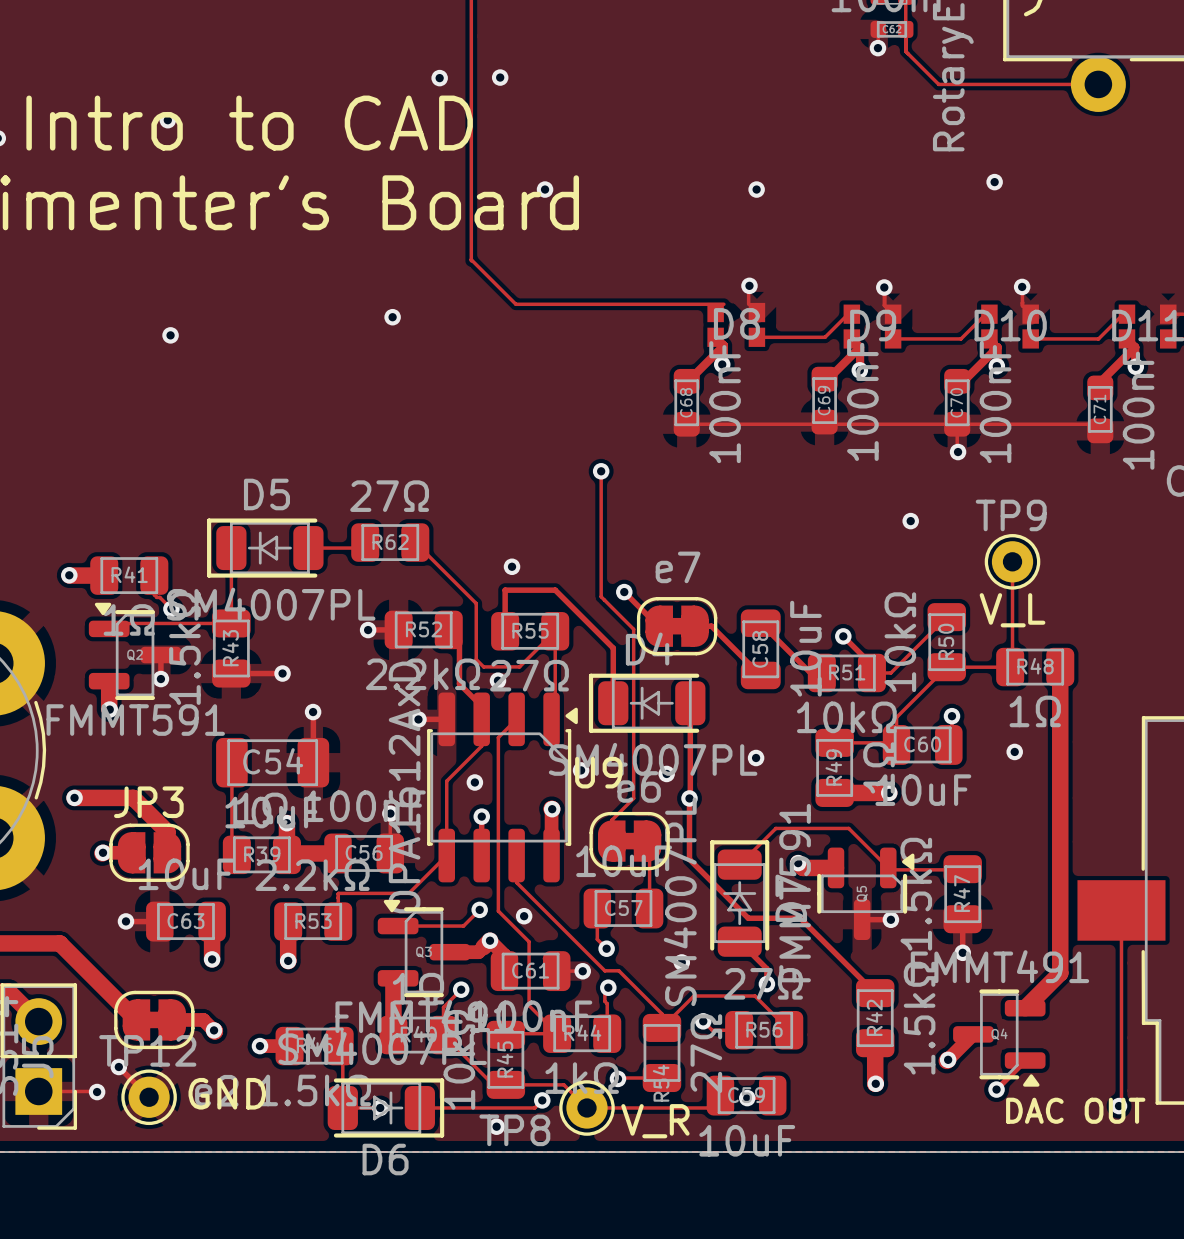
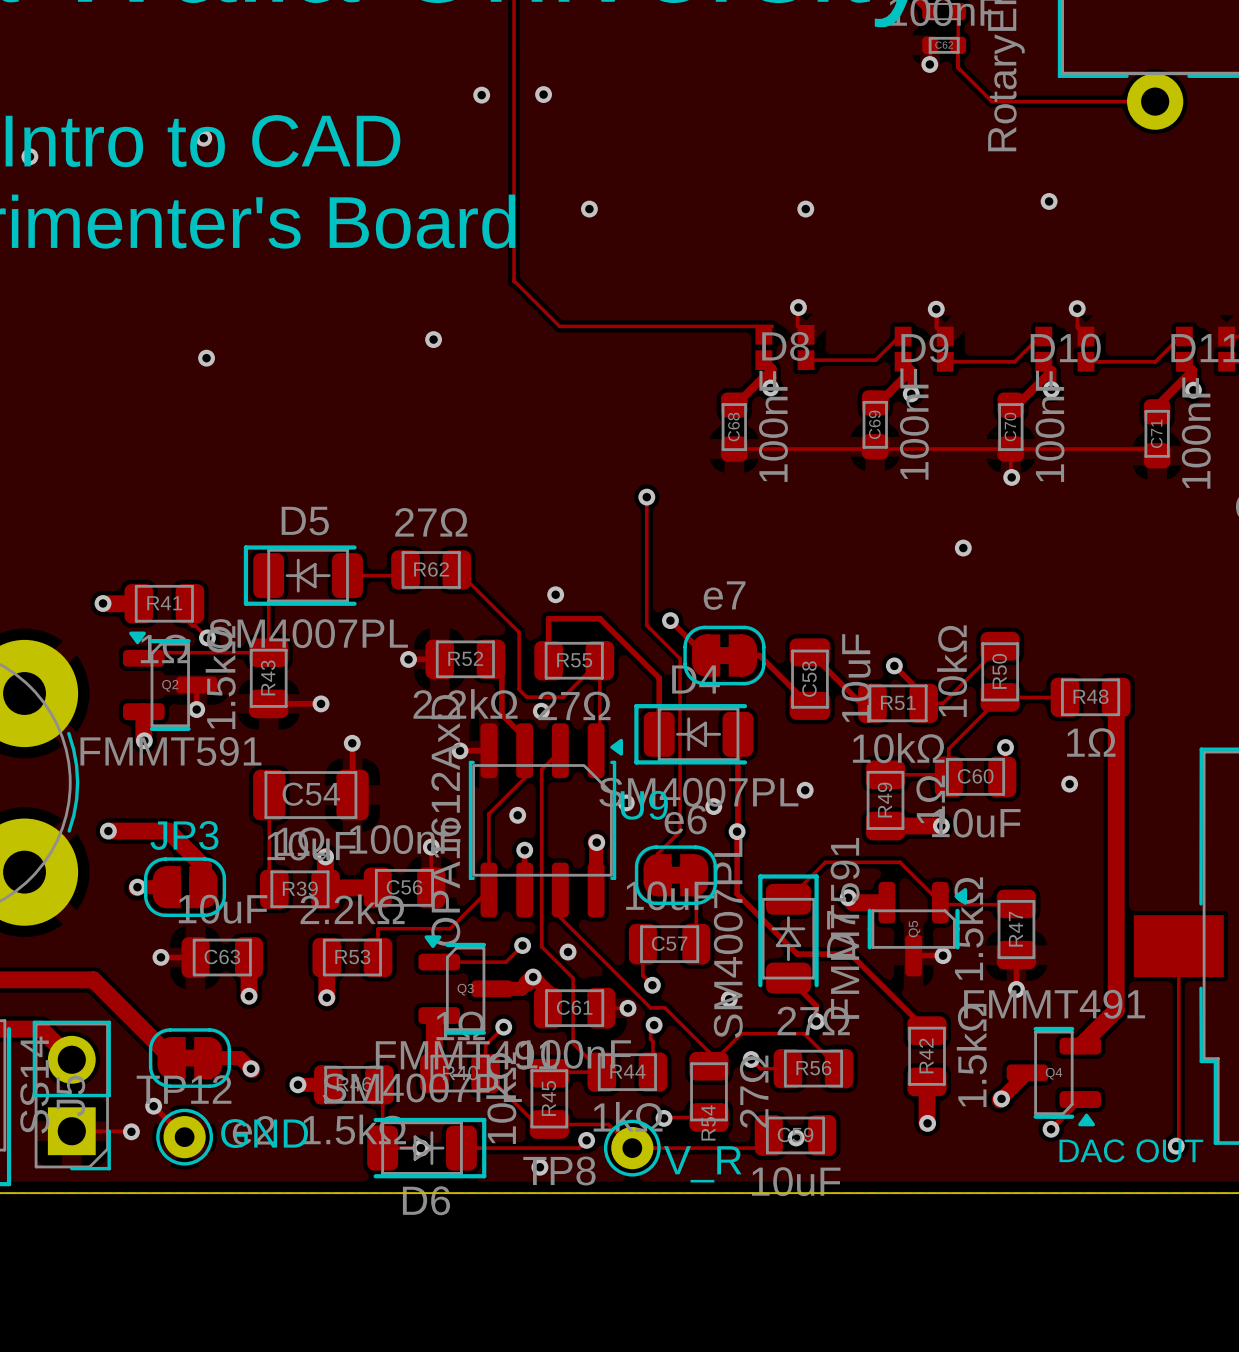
track: (1012, 561) (1012, 664) (1010, 667) -> none
TP9: V_L (1012, 561) -> none

